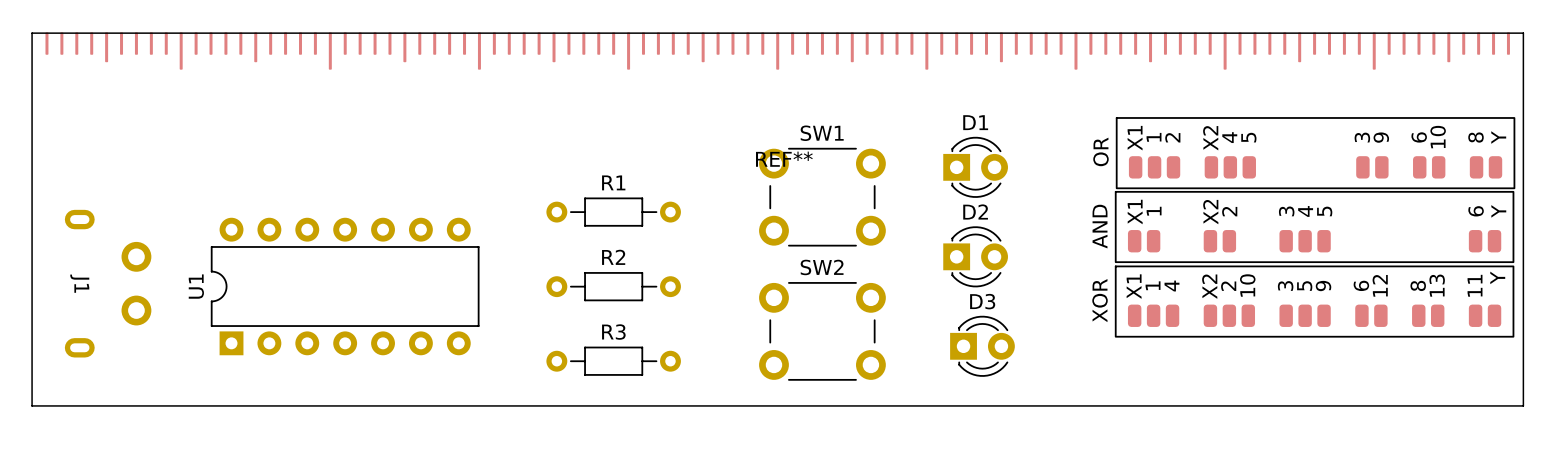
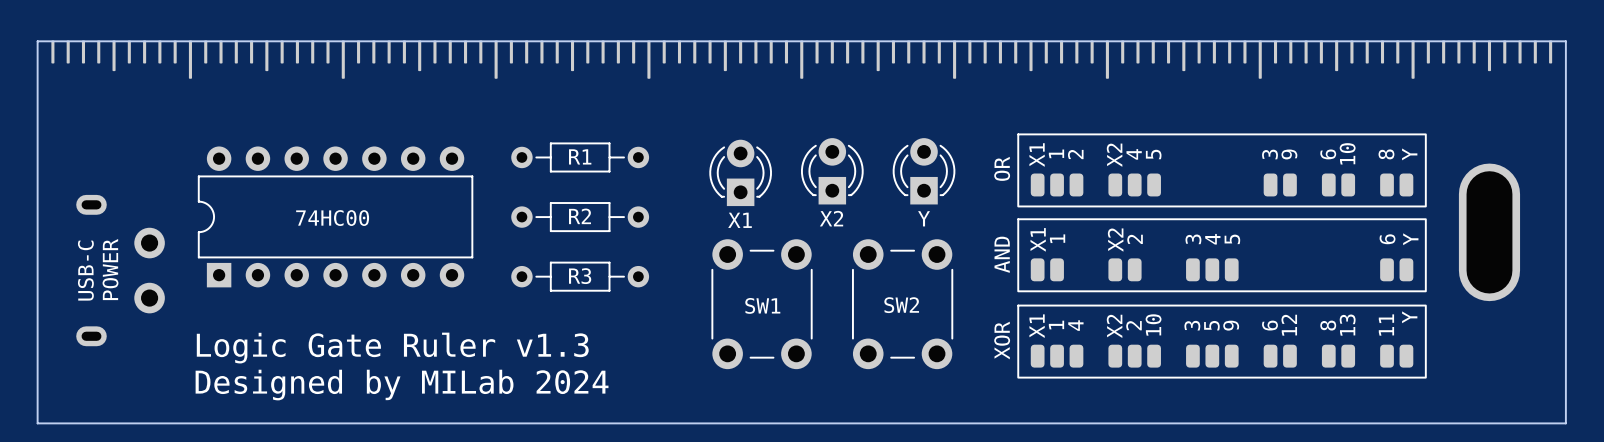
SW1 name position: SW1 (822, 133) -> SW1 (762, 305)
OR position: (1315, 153) -> (1222, 170)
REF** name: REF** (784, 159) -> none
X2: none -> (832, 171)
Y: none -> (924, 171)
X1: none -> (740, 172)
D1: (975, 167) -> none
R1 name position: R1 (613, 182) -> R1 (580, 156)
SW1 rotation: 0° (822, 197) -> 90° clockwise (762, 304)
SW1 position: (822, 197) -> (762, 304)
74HC00: none -> (335, 216)
R1 position: (613, 212) -> (580, 157)
part: none -> (1489, 232)
AND position: (1314, 227) -> (1222, 255)
text: none -> USB-C (85, 270)
text: none -> POWER (110, 269)
part: none -> (120, 270)
D2: (975, 256) -> none
R2 name position: R2 (613, 257) -> R2 (580, 216)
SW2 name position: SW2 (822, 267) -> SW2 (901, 305)
J1: (108, 283) -> none
U1: (345, 286) -> none
R2 position: (613, 286) -> (580, 217)
XOR position: (1314, 301) -> (1222, 341)
SW2 rotation: 0° (822, 331) -> 90° clockwise (902, 304)
text: none -> Logic Gate Ruler v1.3 (392, 348)
R3 name position: R3 (613, 332) -> R3 (580, 276)
D3: (982, 346) -> none
R3 position: (613, 361) -> (580, 276)
text: none -> Designed by MILab 2024 (402, 385)

